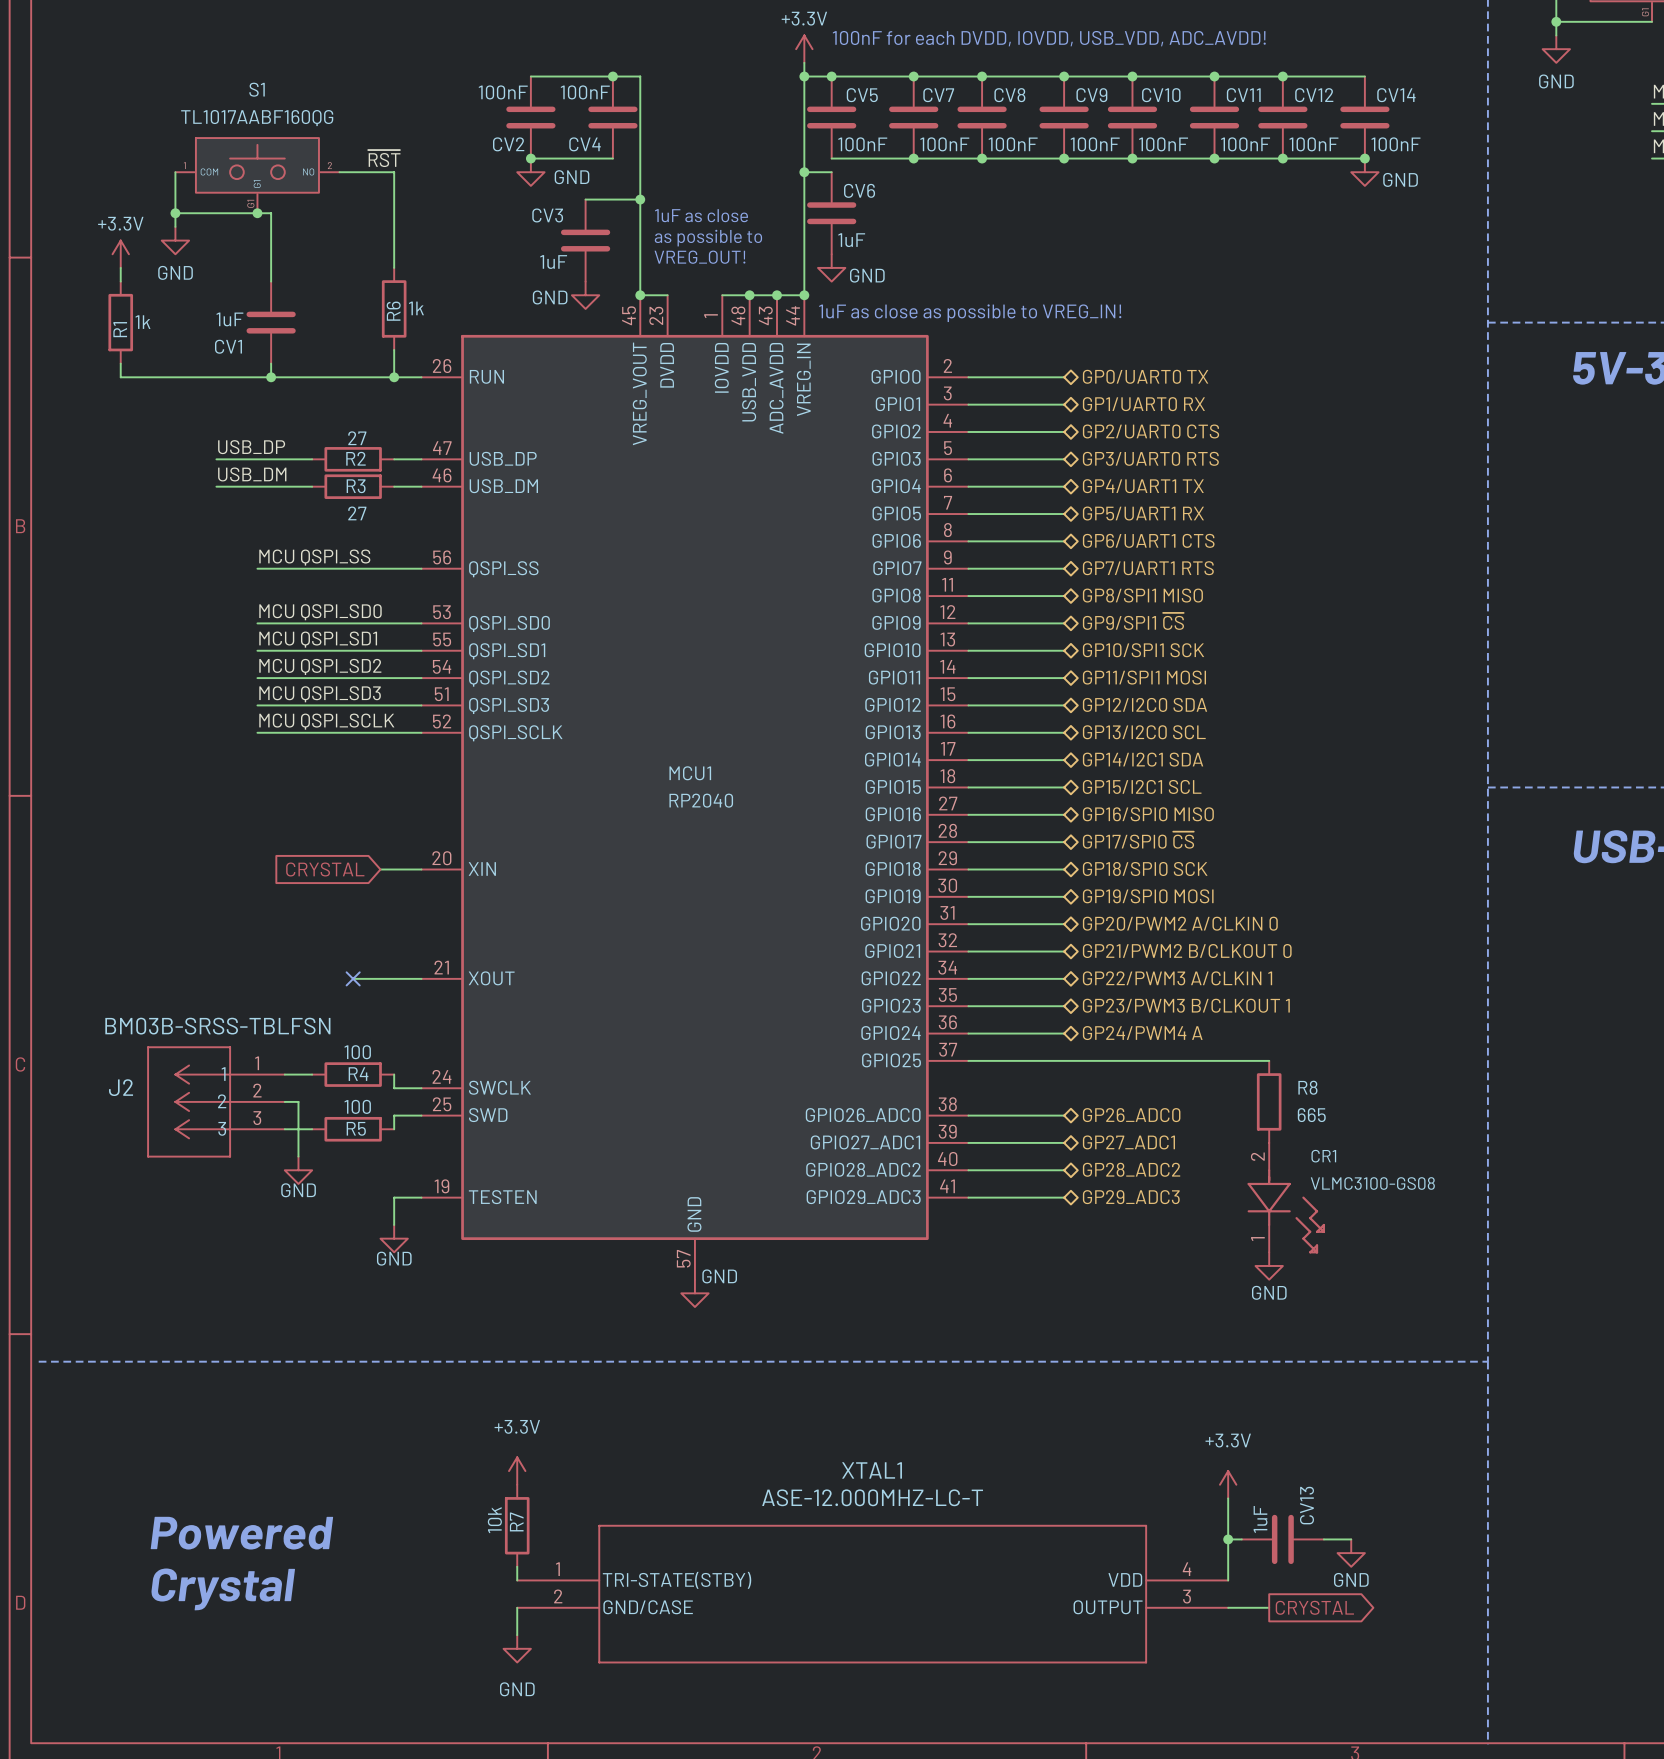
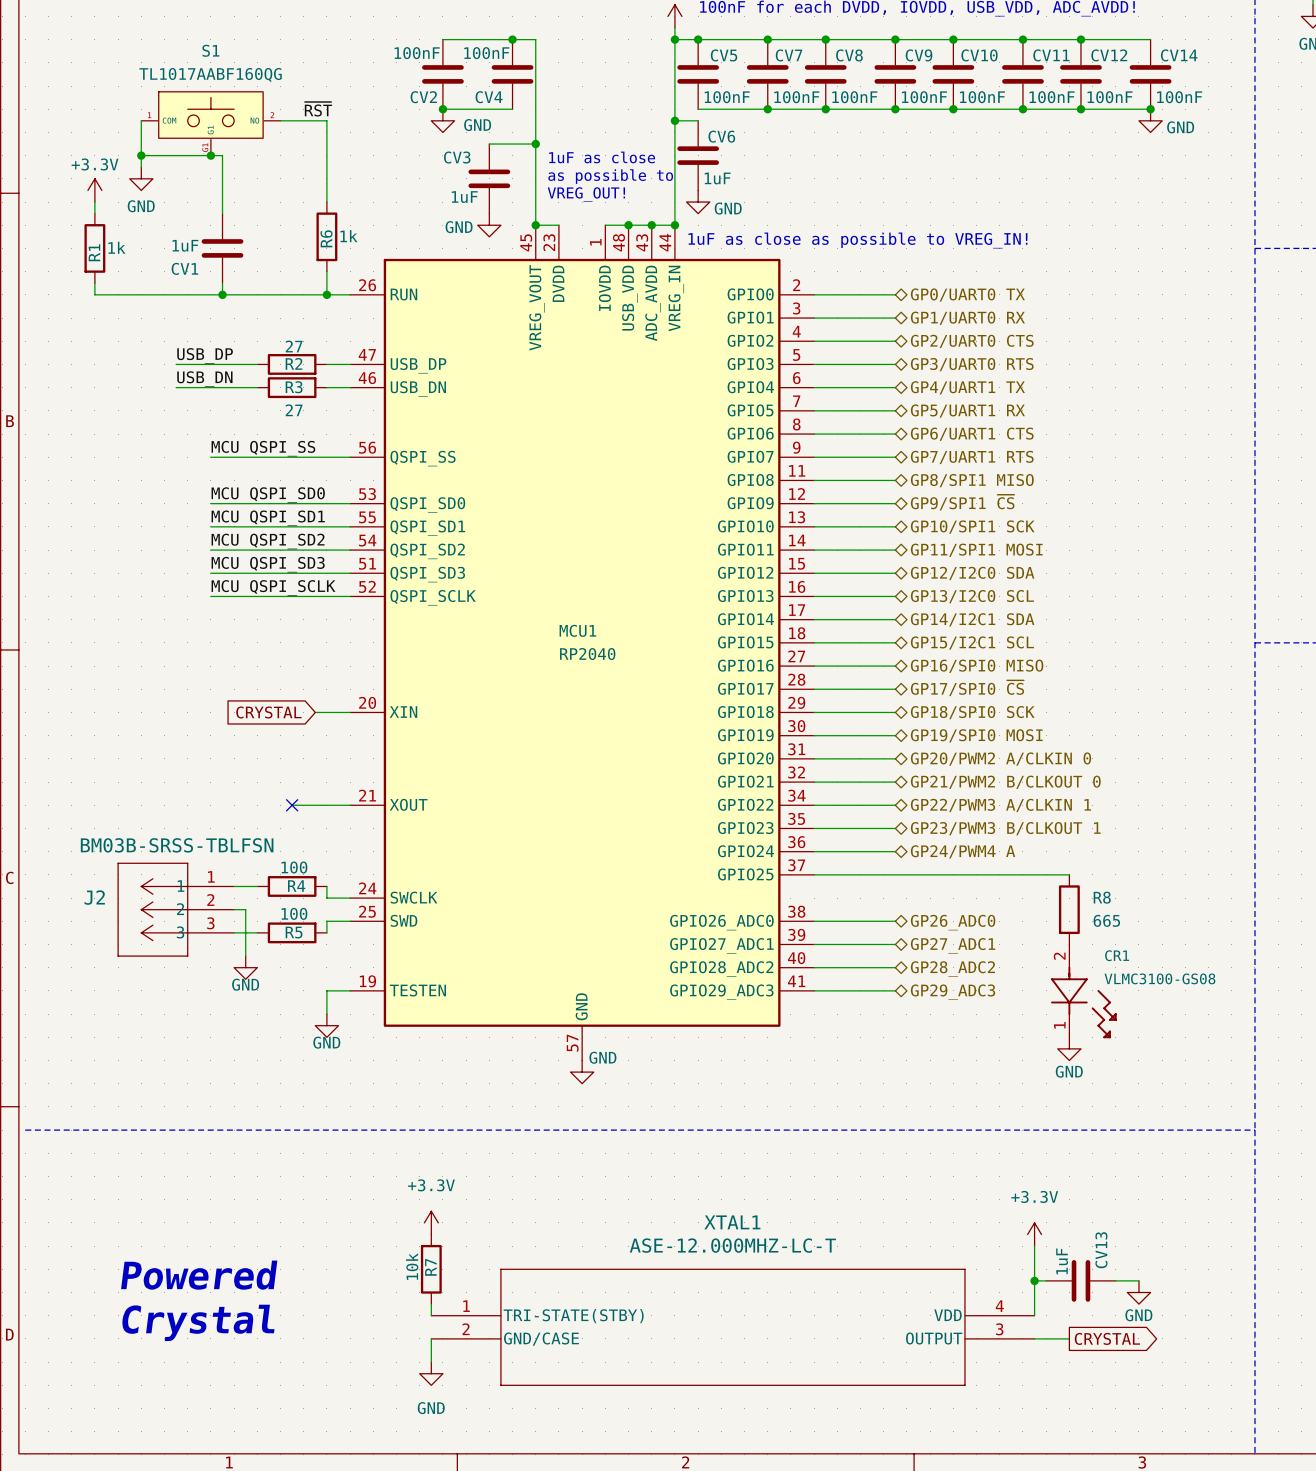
label: USB_DM (252, 474) -> USB_DN (204, 379)
MCU1 pin name: USB_DM (503, 486) -> USB_DN (418, 388)

